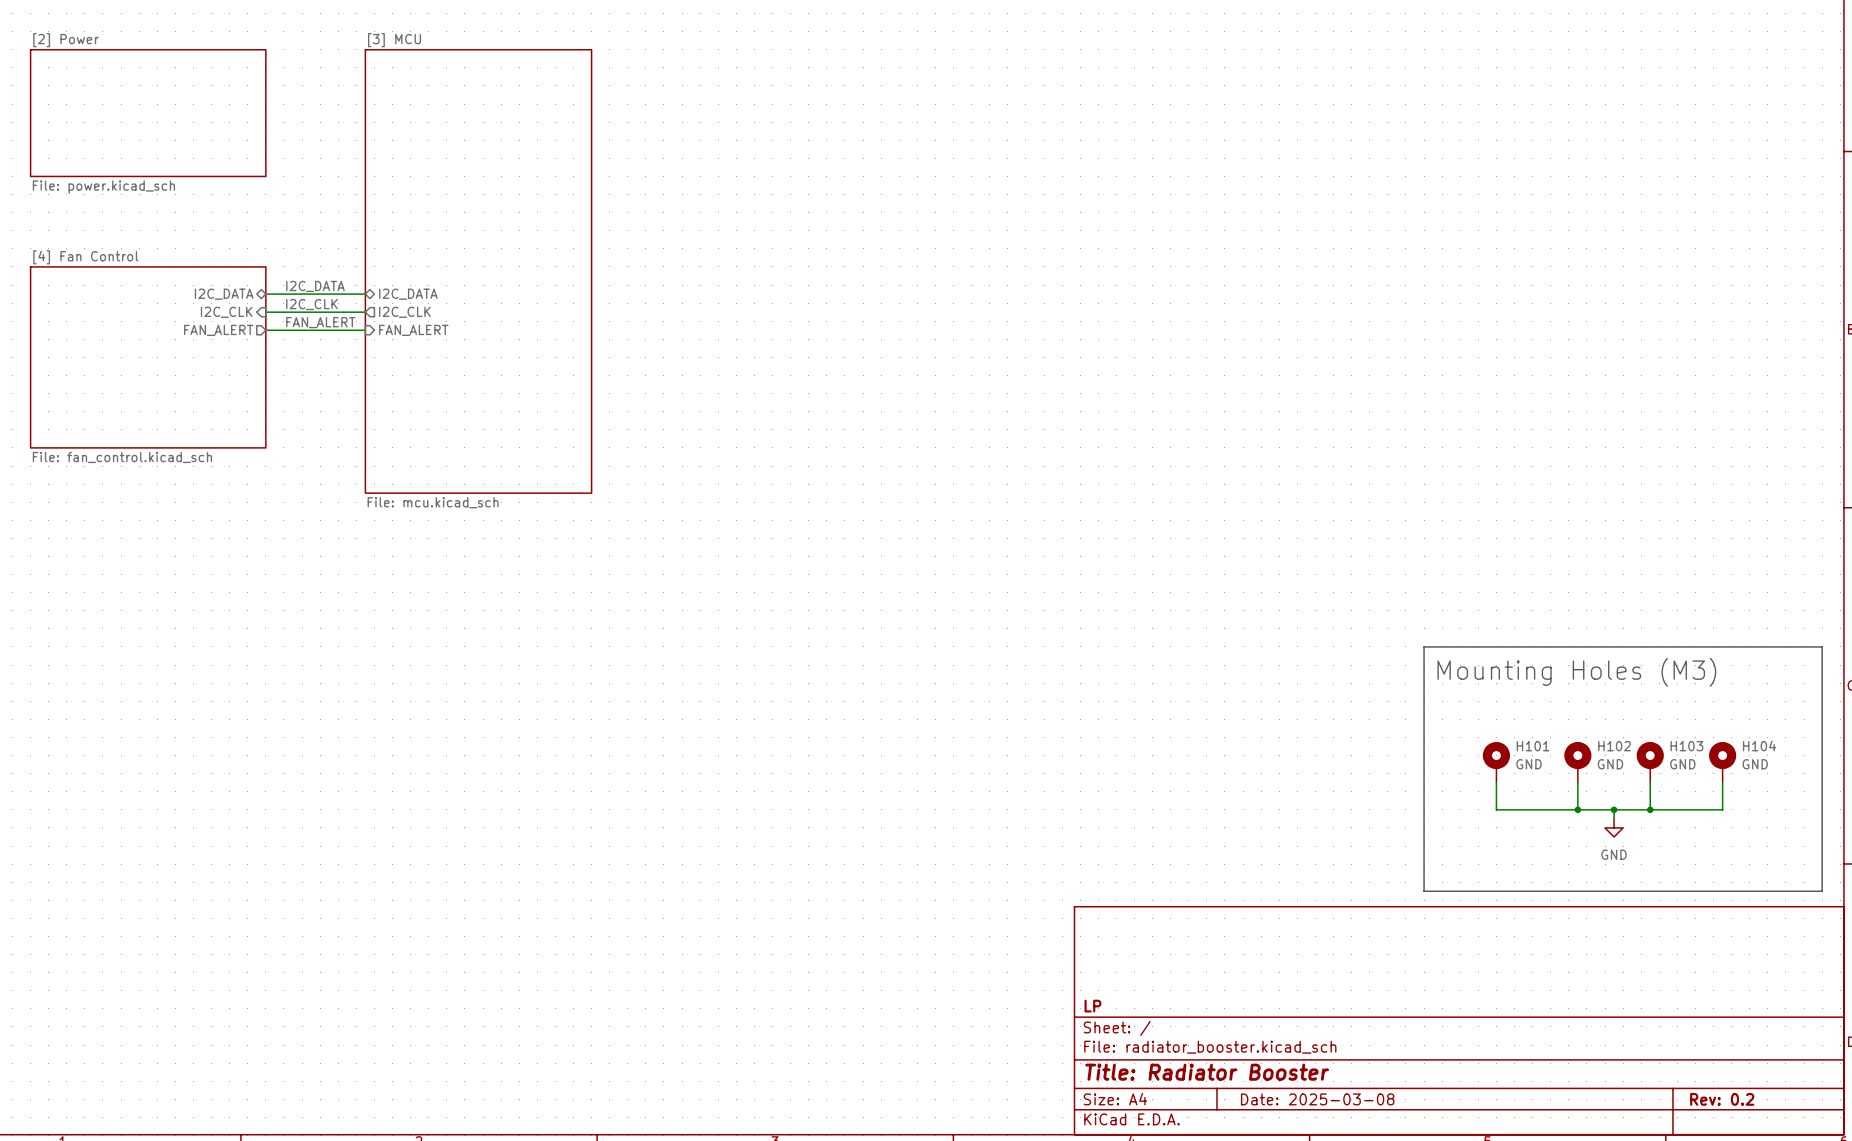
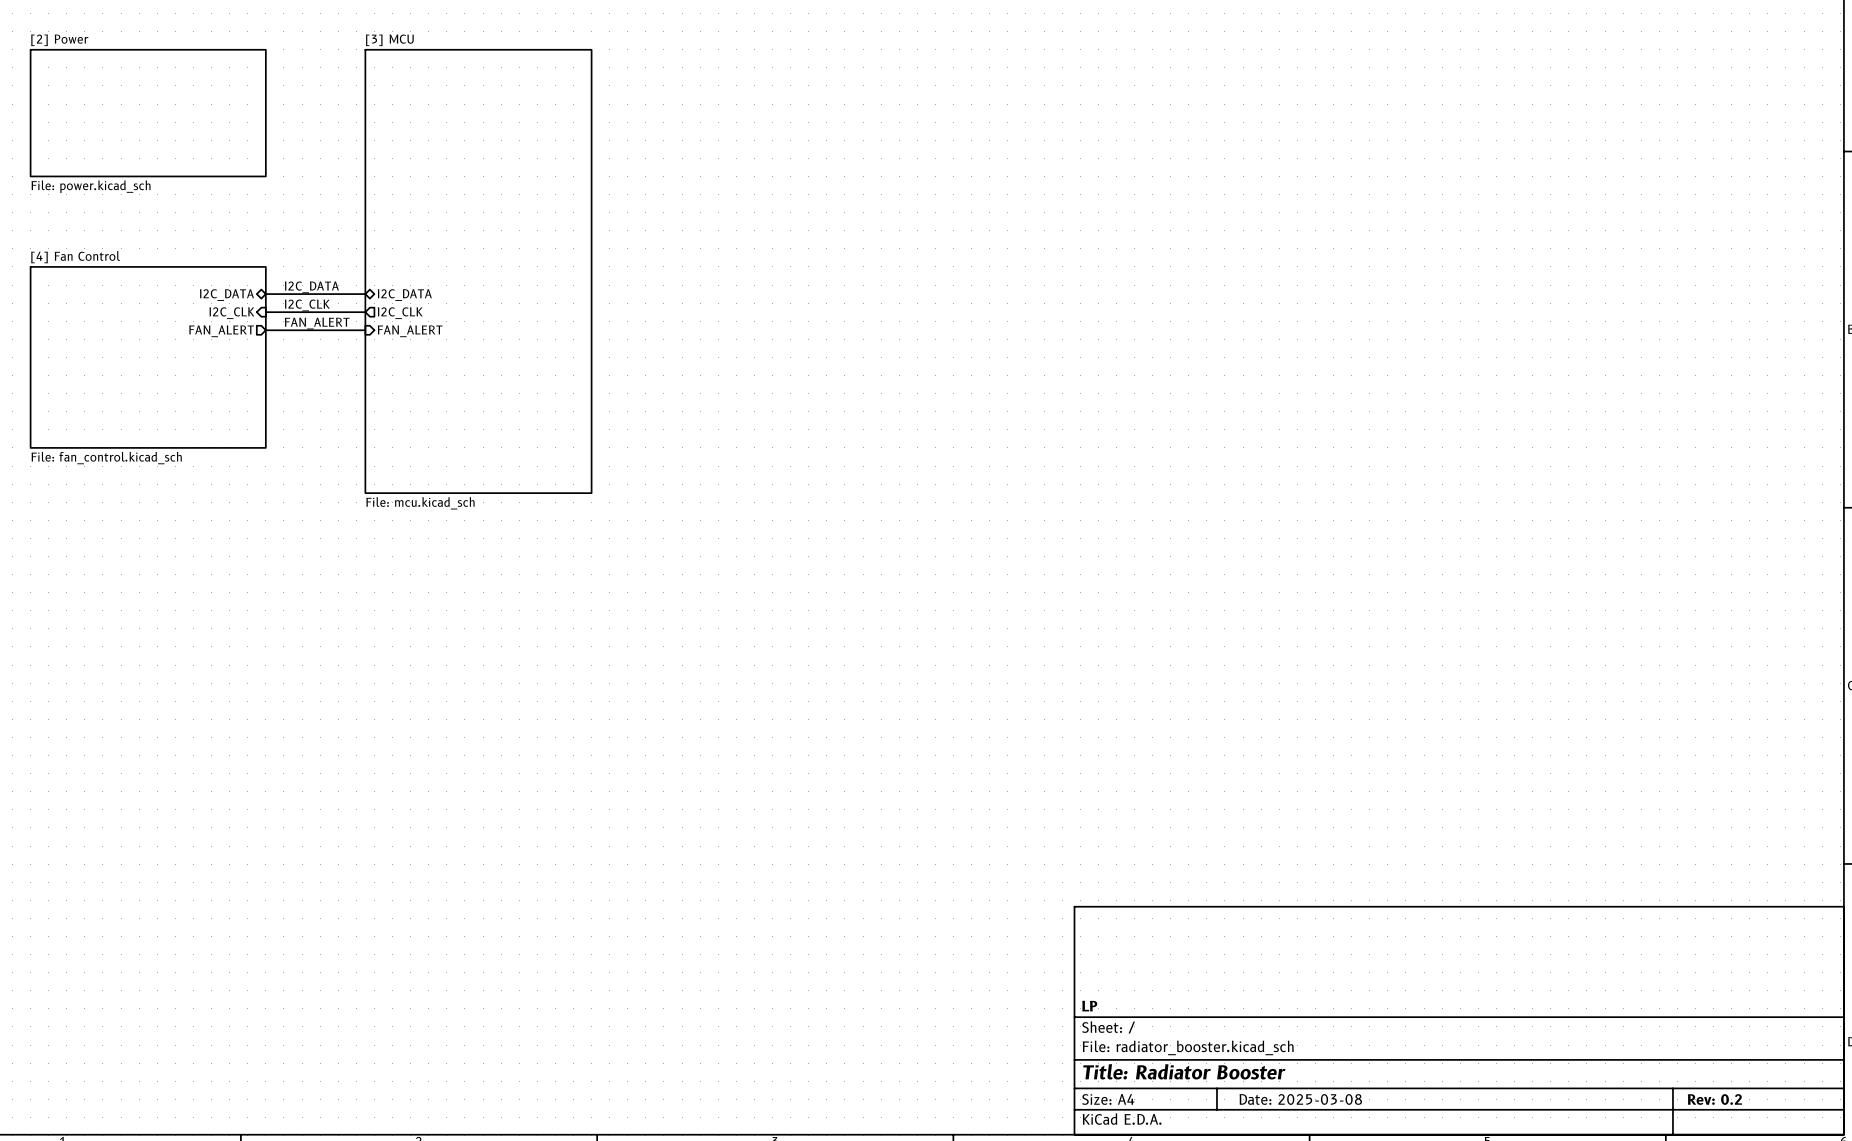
line: (1424, 646) (1424, 891) (1822, 891) (1822, 646) (1424, 646) -> none
text: Mounting Holes (M3) (1576, 672) -> none
H101: GND (1496, 762) -> none
H102: GND (1577, 762) -> none
H103: GND (1650, 762) -> none
H104: GND (1722, 762) -> none
wire: (1496, 782) (1496, 809) (1722, 809) (1722, 782) -> none
wire: (1577, 782) (1577, 809) -> none
wire: (1650, 782) (1650, 809) -> none
junction: (1577, 809) -> none
wire: (1614, 809) (1614, 818) -> none
junction: (1614, 809) -> none
junction: (1650, 809) -> none
power symbol: GND (1614, 827) -> none

